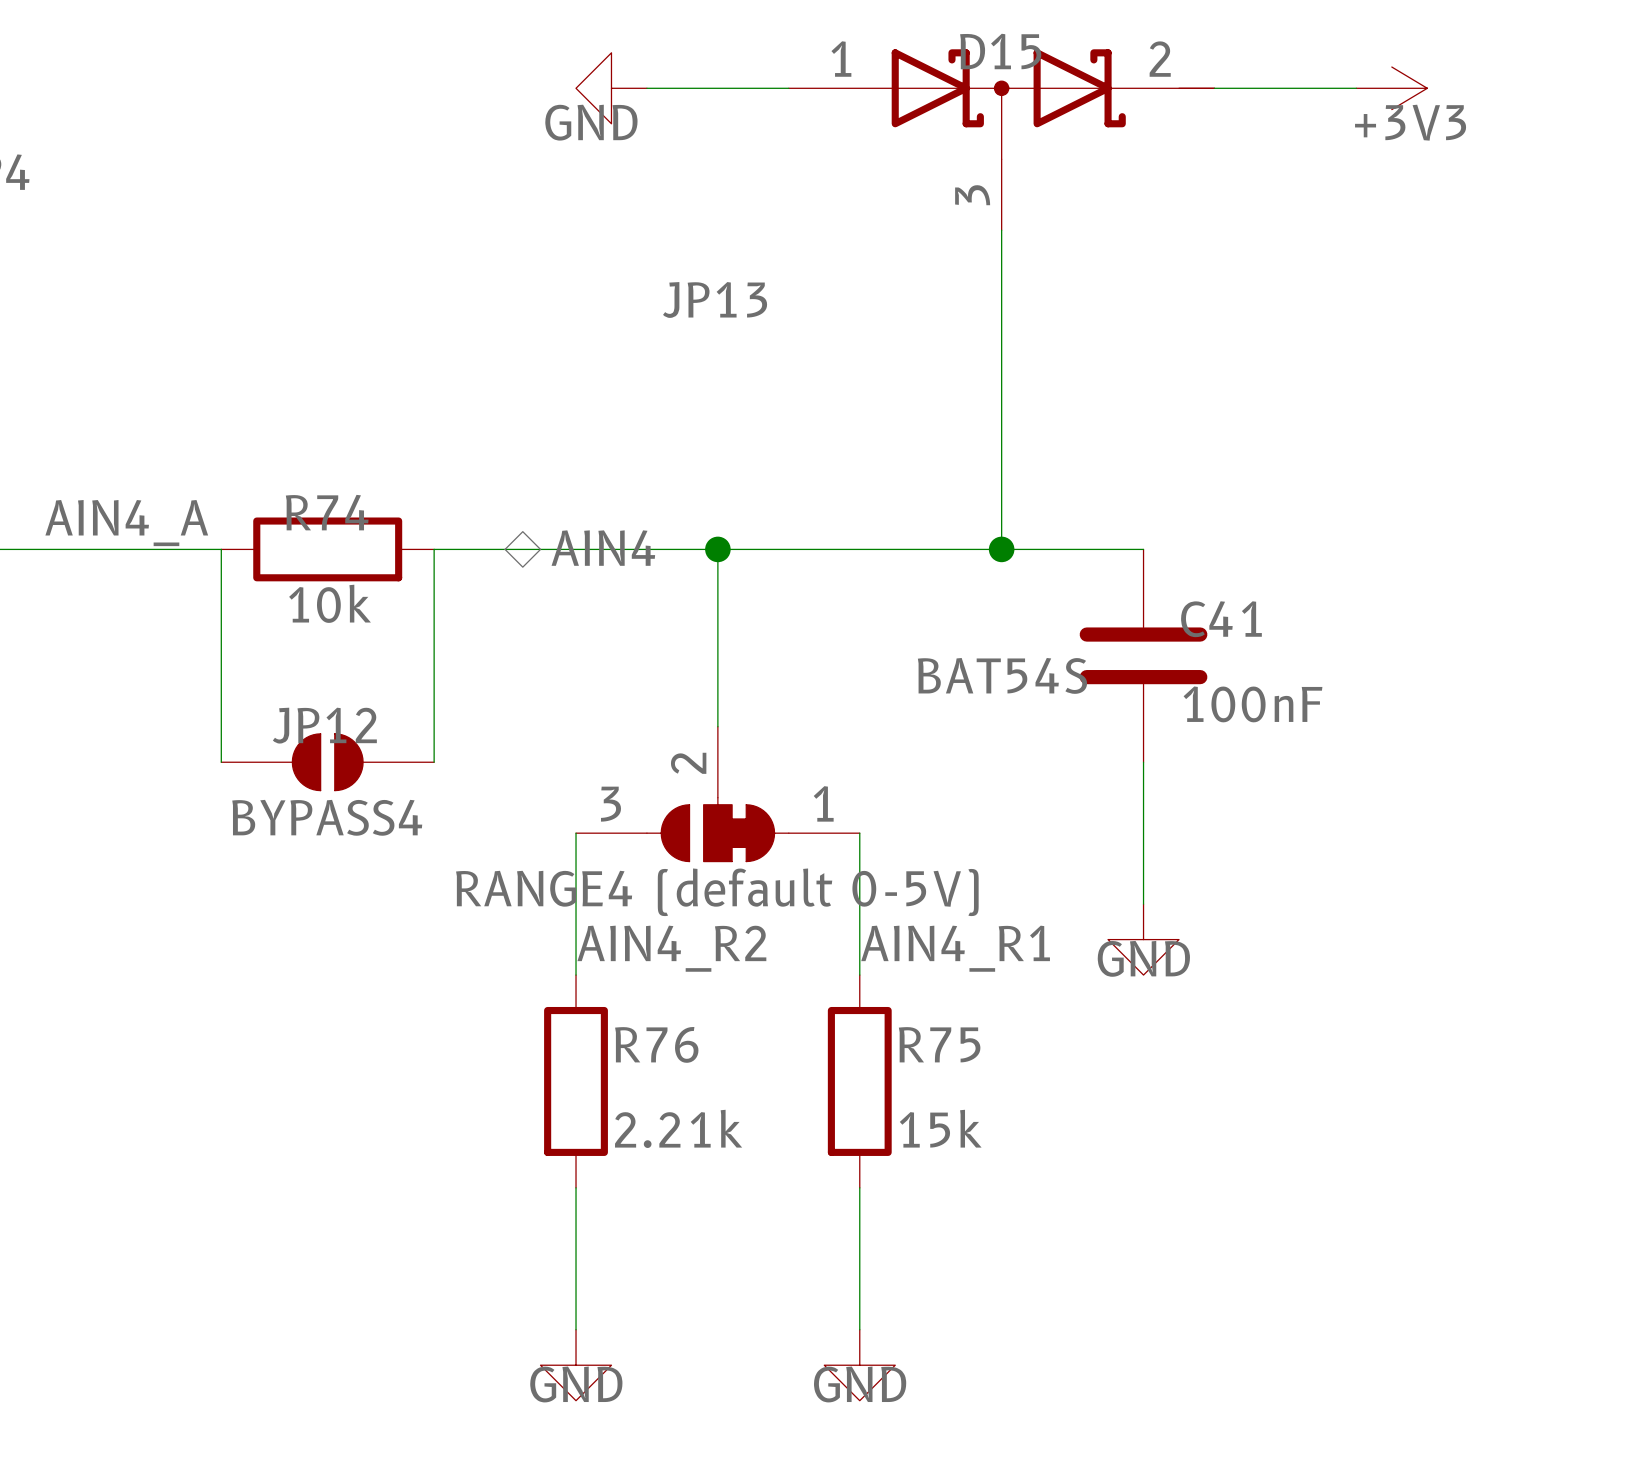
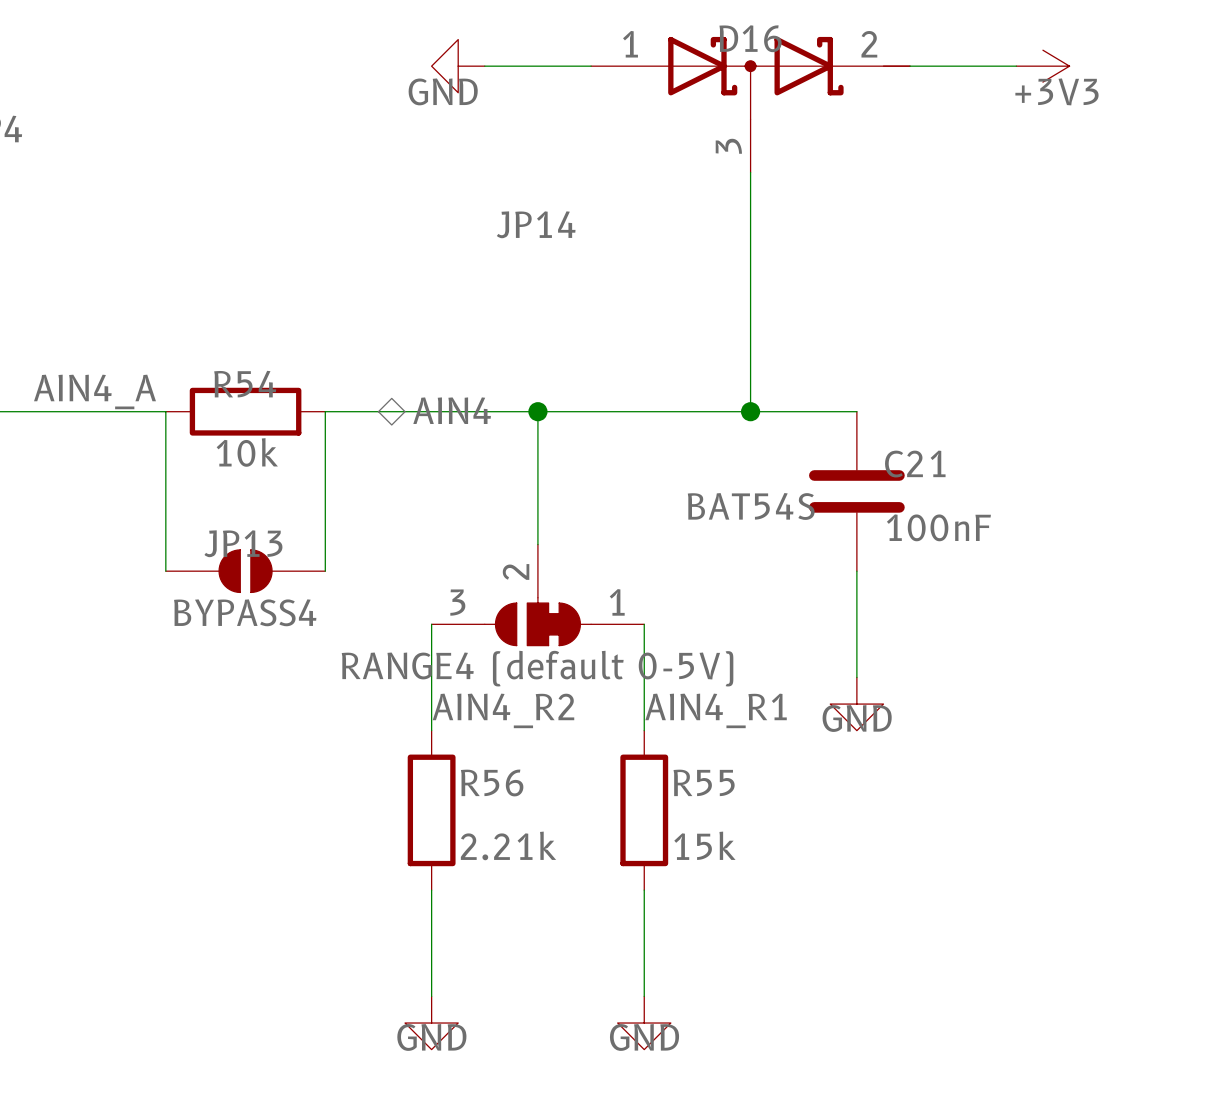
D15 name: D15 (1000, 51) -> D16 (750, 38)
JP13 name: JP13 (715, 299) -> JP14 (536, 224)
R74 name: R74 (327, 512) -> R54 (245, 384)
C41 name: C41 (1221, 619) -> C21 (915, 464)
JP12 name: JP12 (324, 725) -> JP13 (243, 543)
R76 name: R76 (656, 1044) -> R56 (492, 782)
R75 name: R75 (939, 1044) -> R55 (704, 782)

